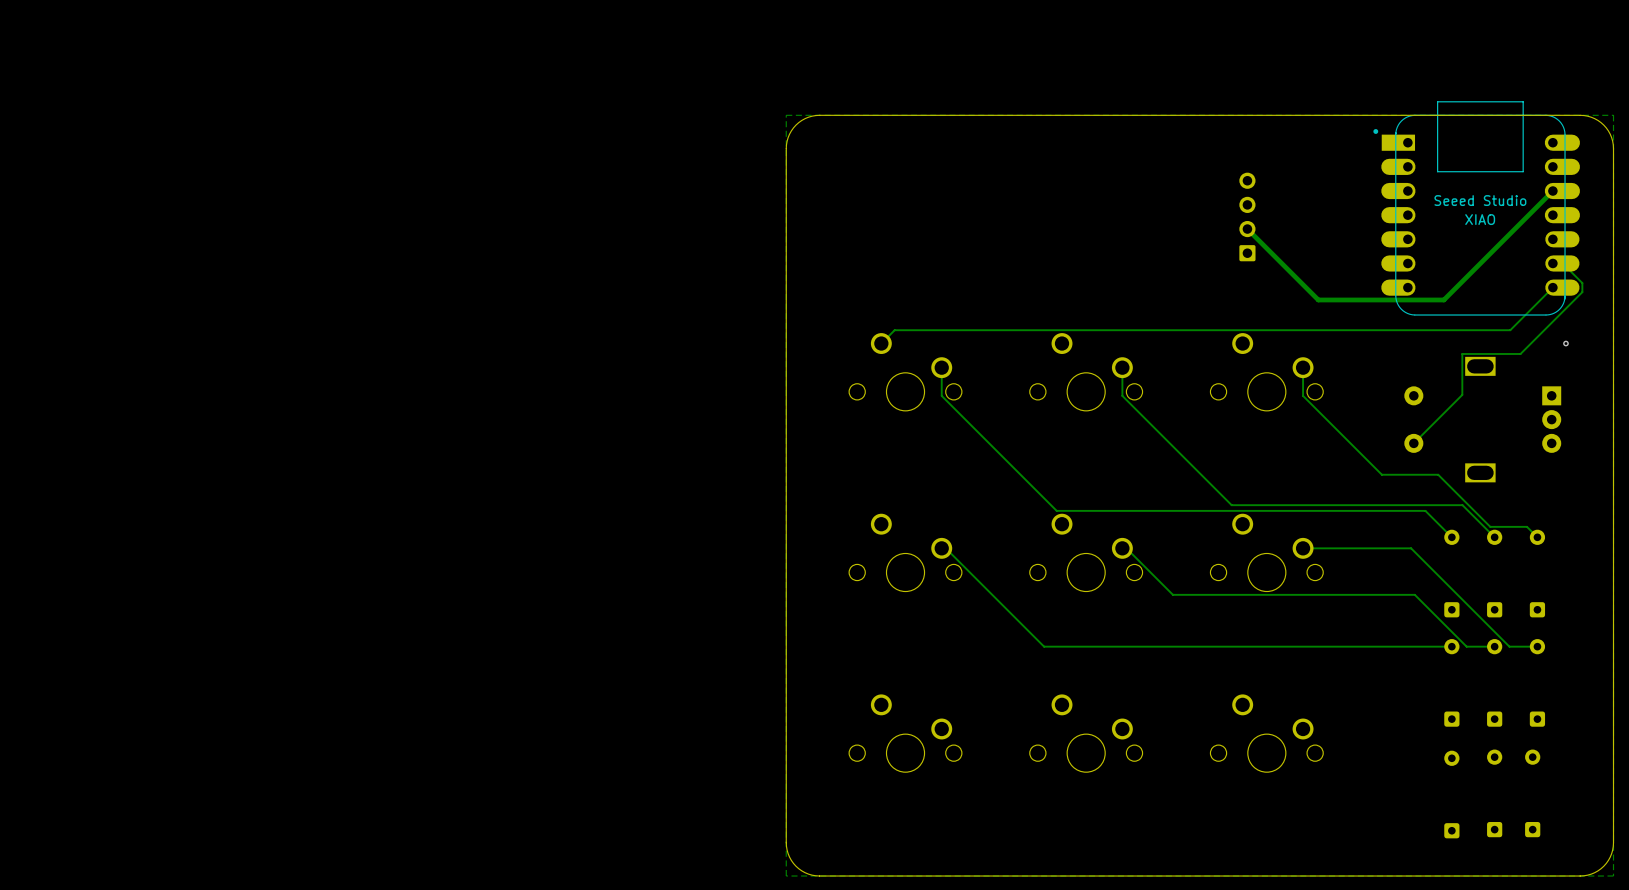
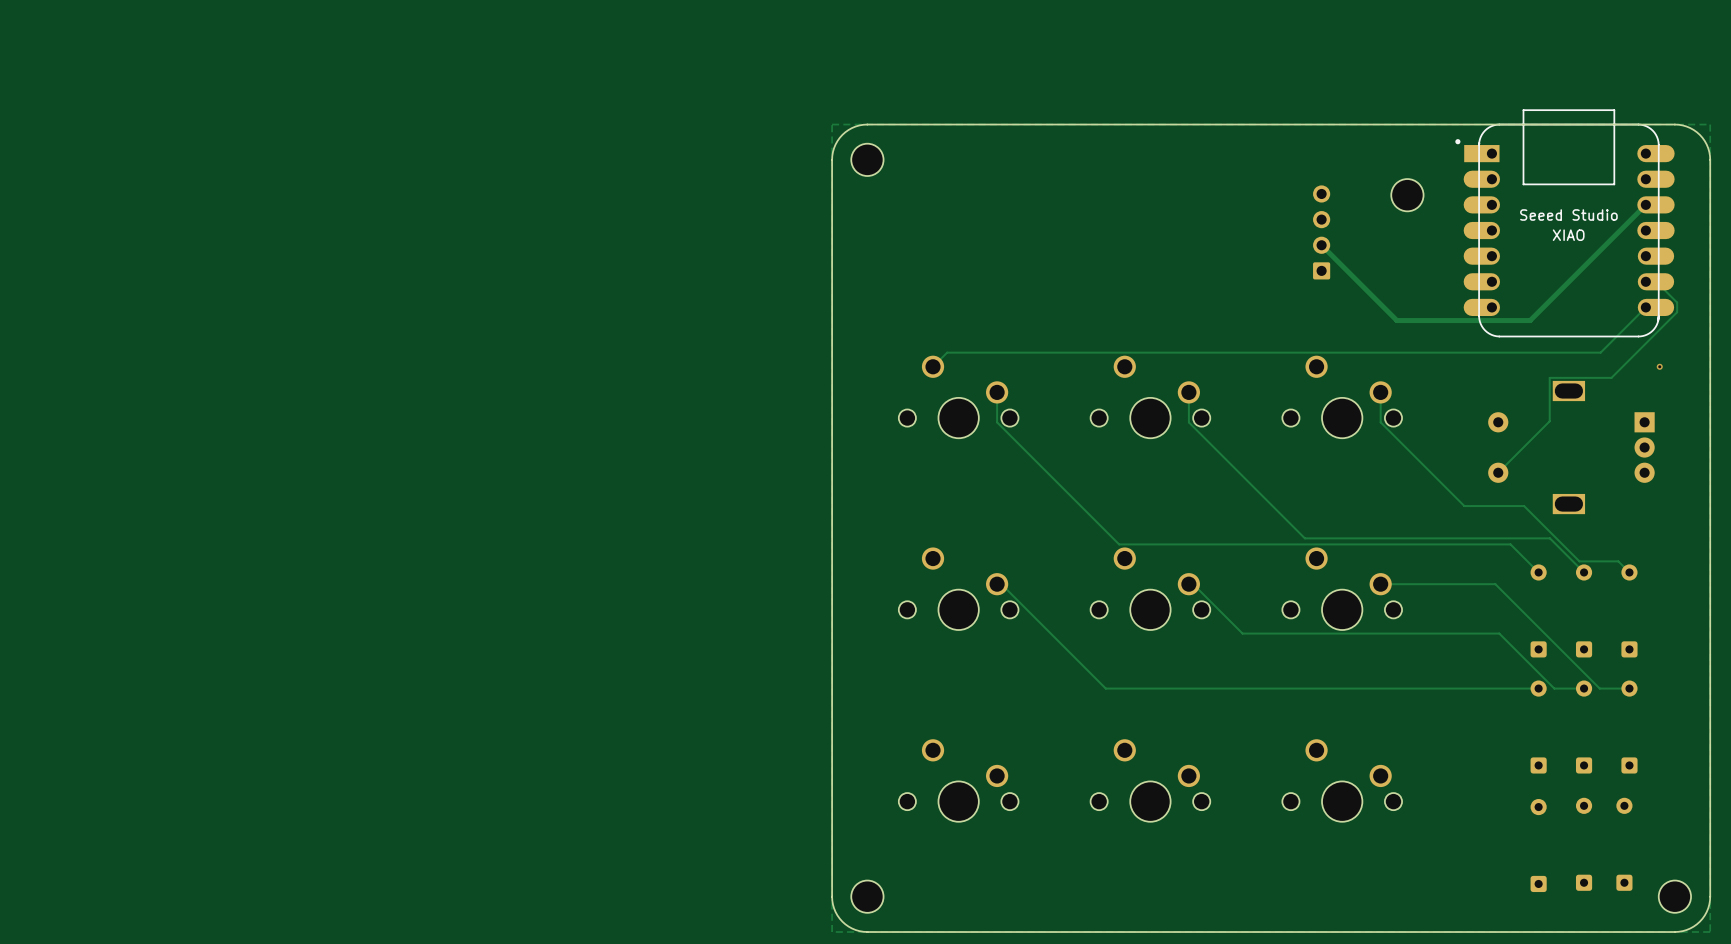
part: none -> (867, 159)
part: none -> (1407, 195)
part: none -> (867, 896)
part: none -> (1674, 896)

